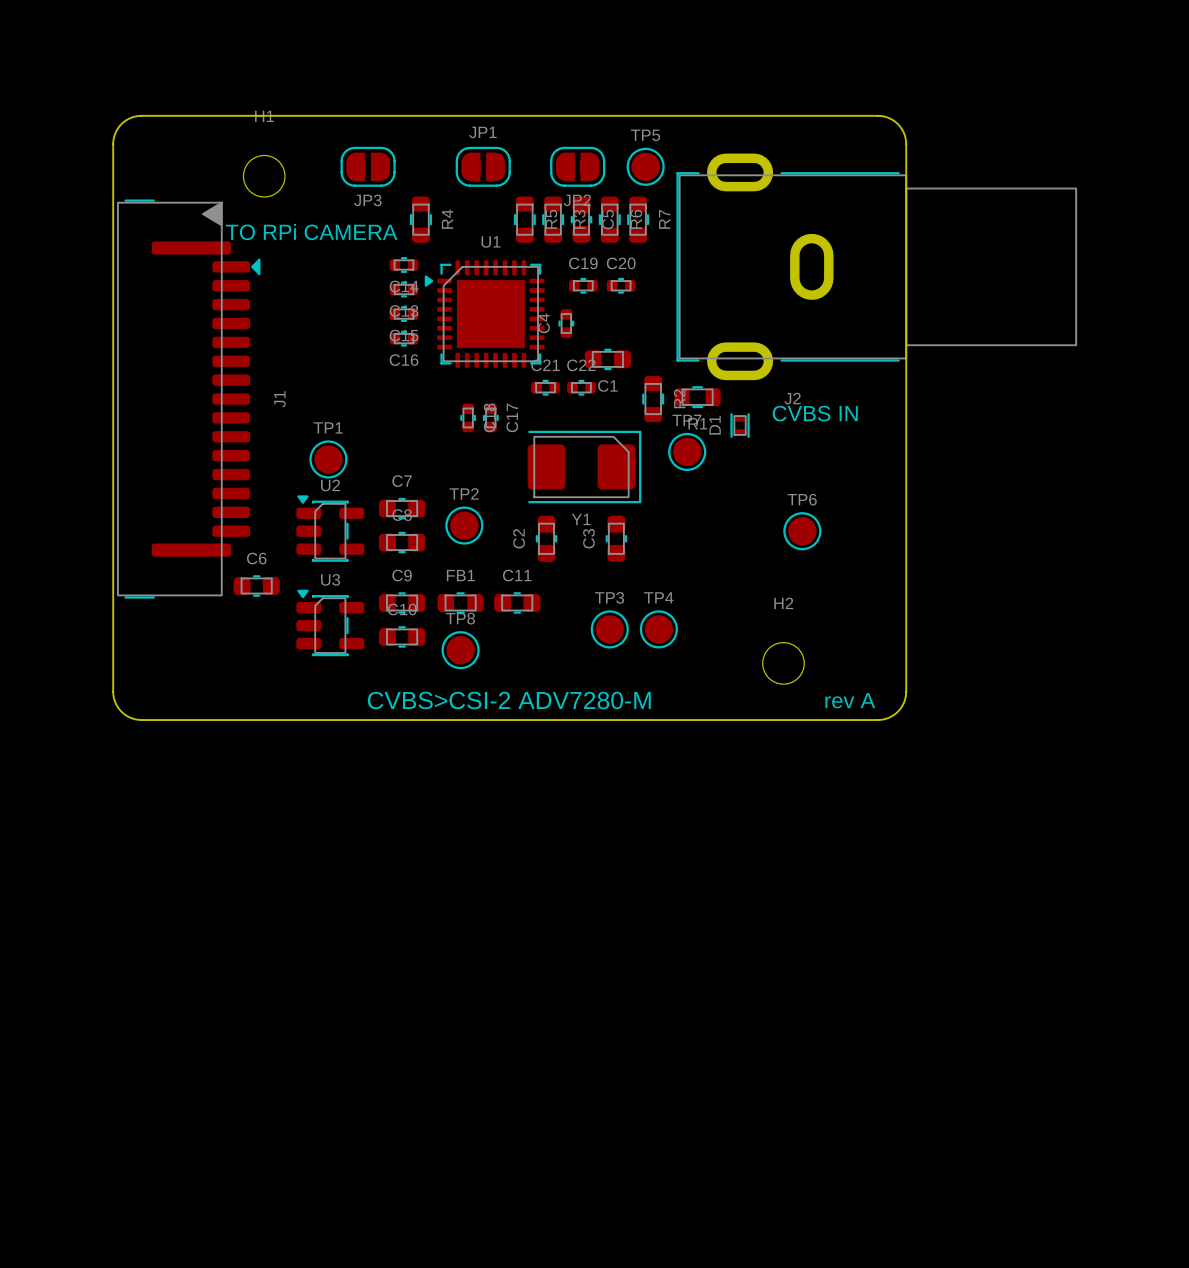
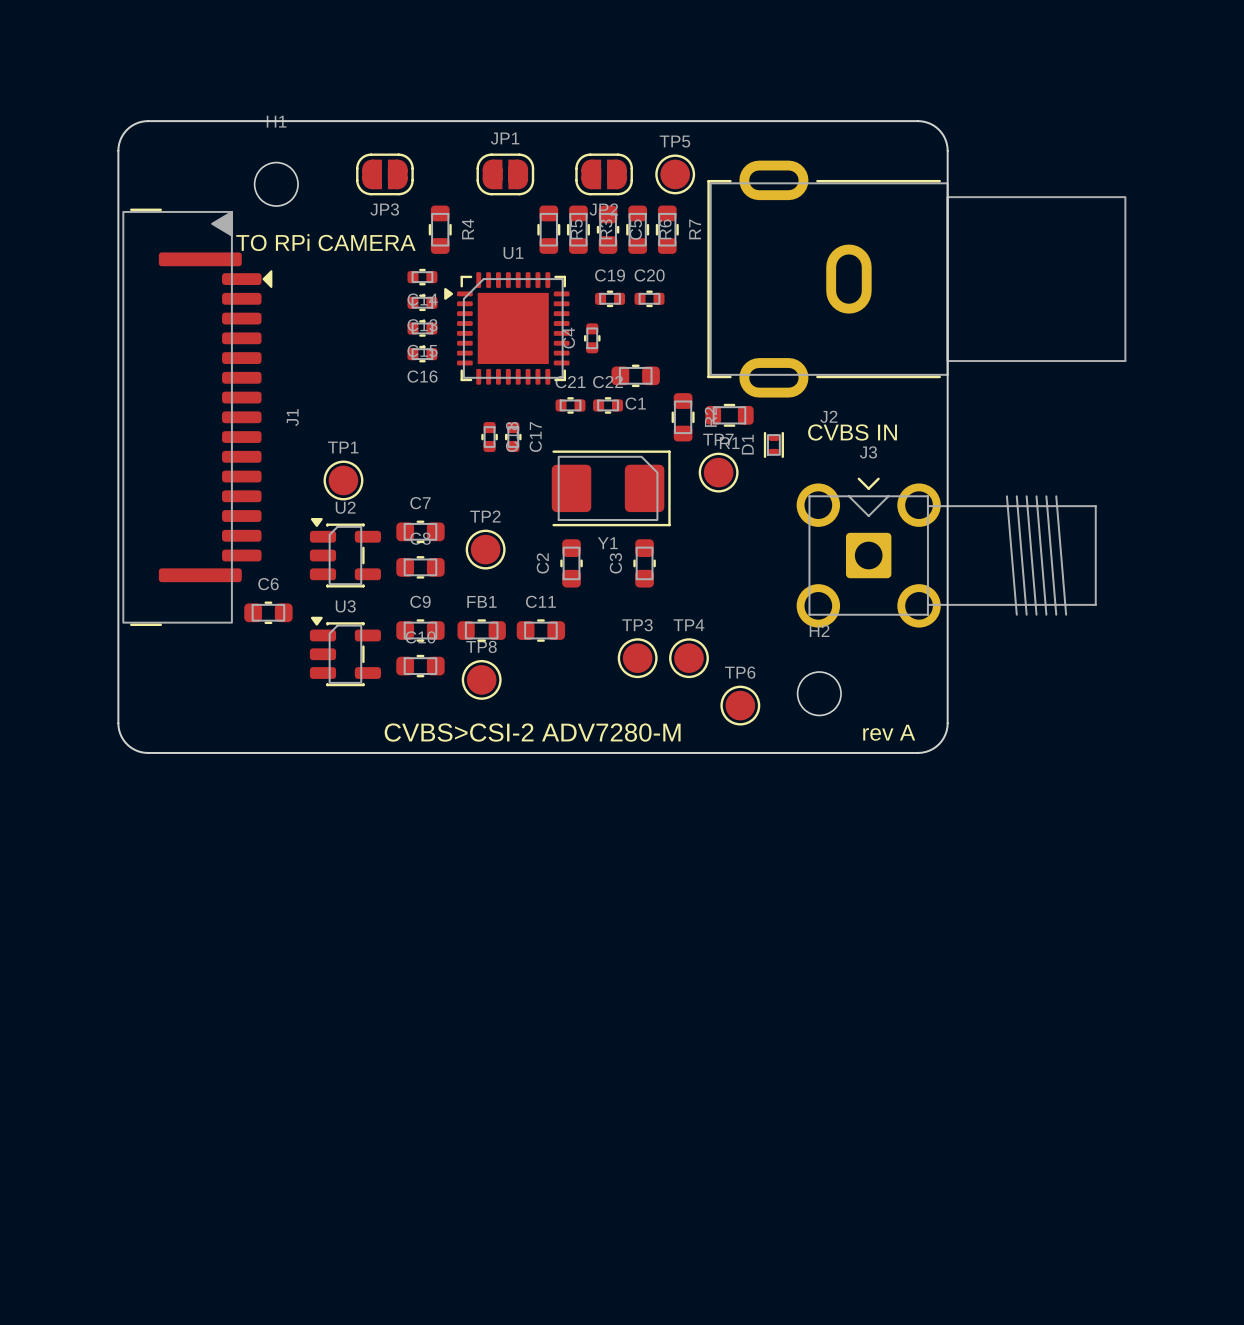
J3: none -> (946, 552)
TP6 position: (802, 531) -> (740, 705)

